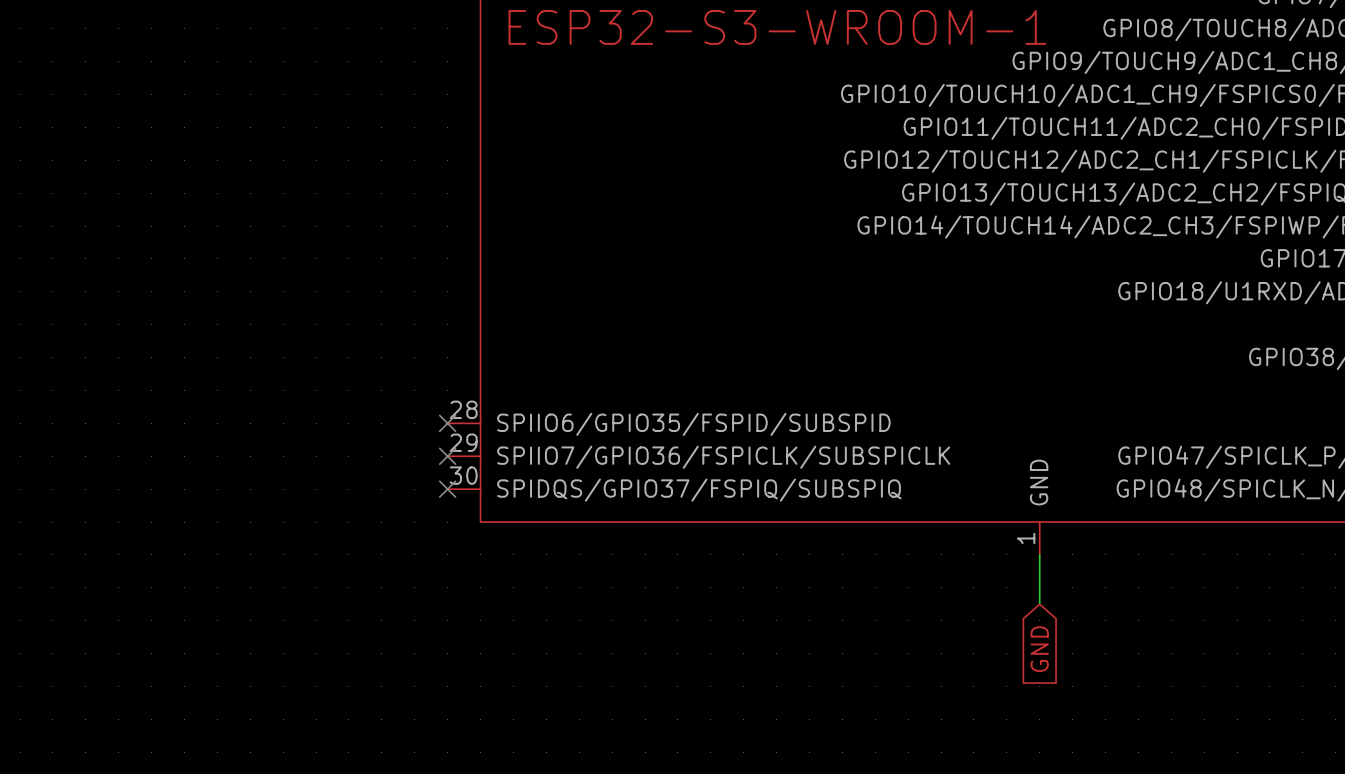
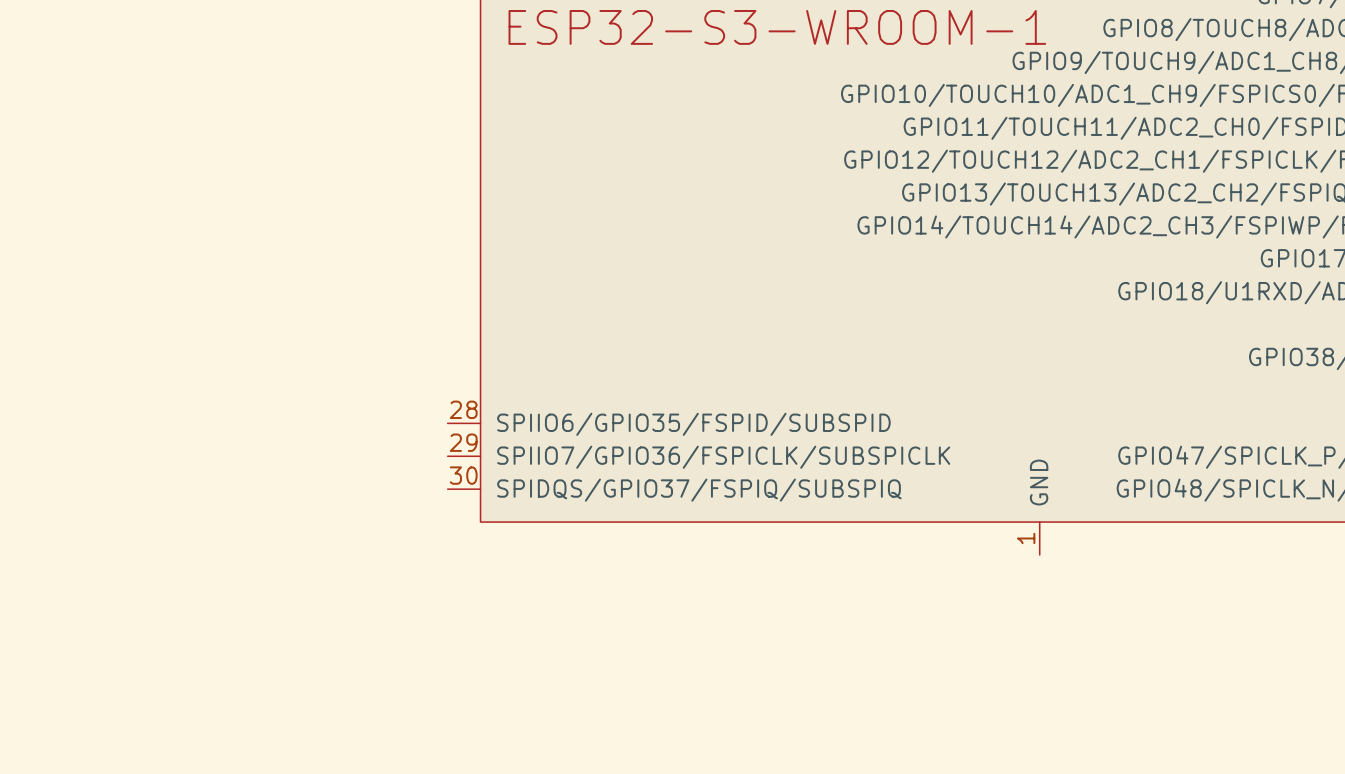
no-connect mark: (447, 423) -> none
no-connect mark: (447, 456) -> none
no-connect mark: (447, 489) -> none
wire: (1039, 554) (1039, 604) -> none
global label: GND (1039, 649) -> none

